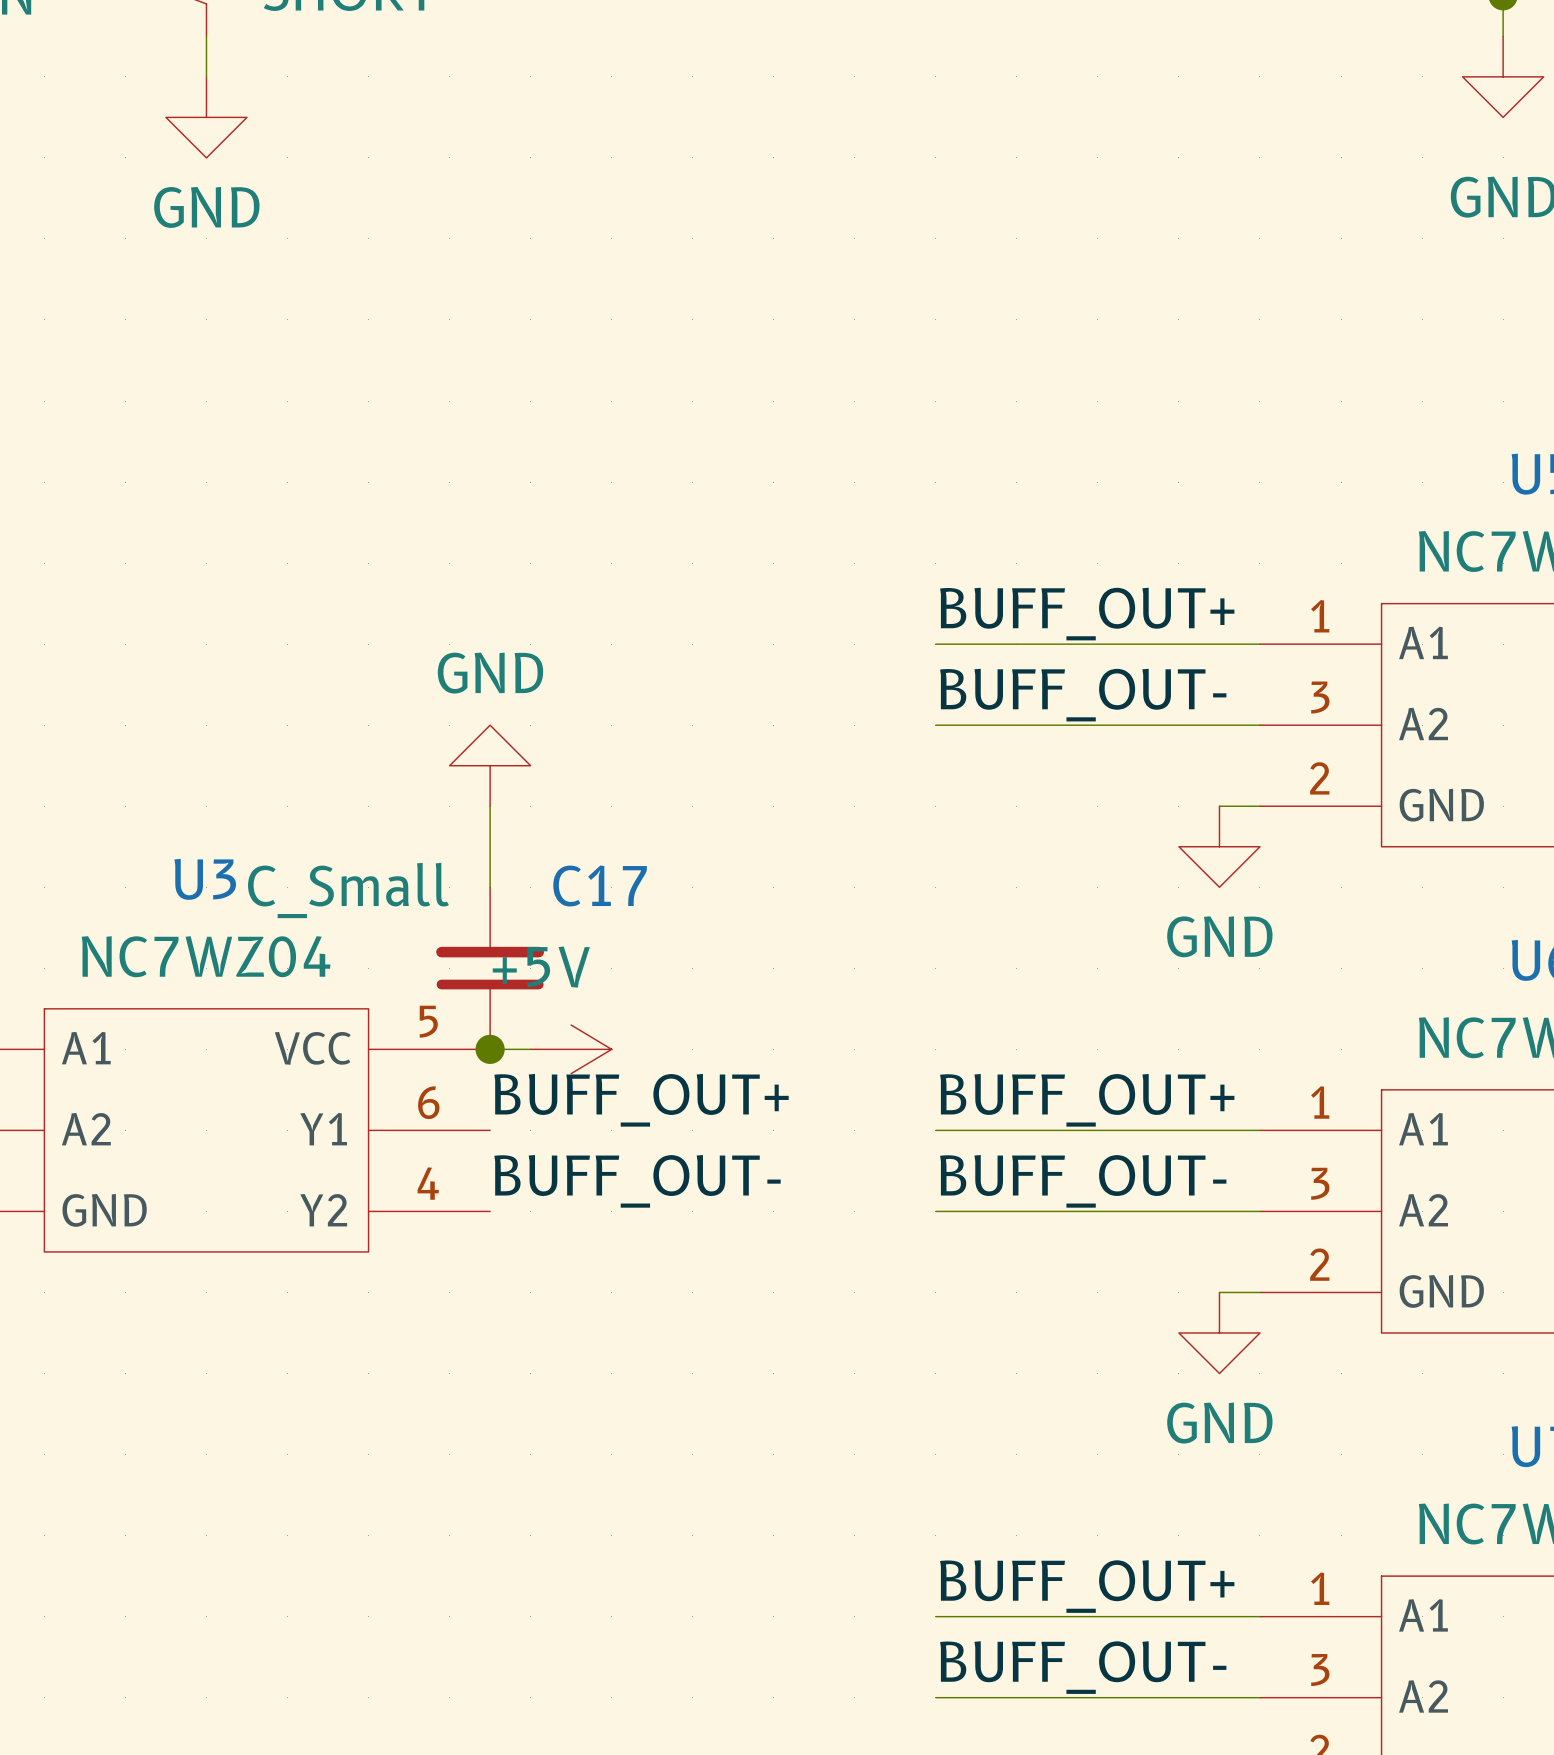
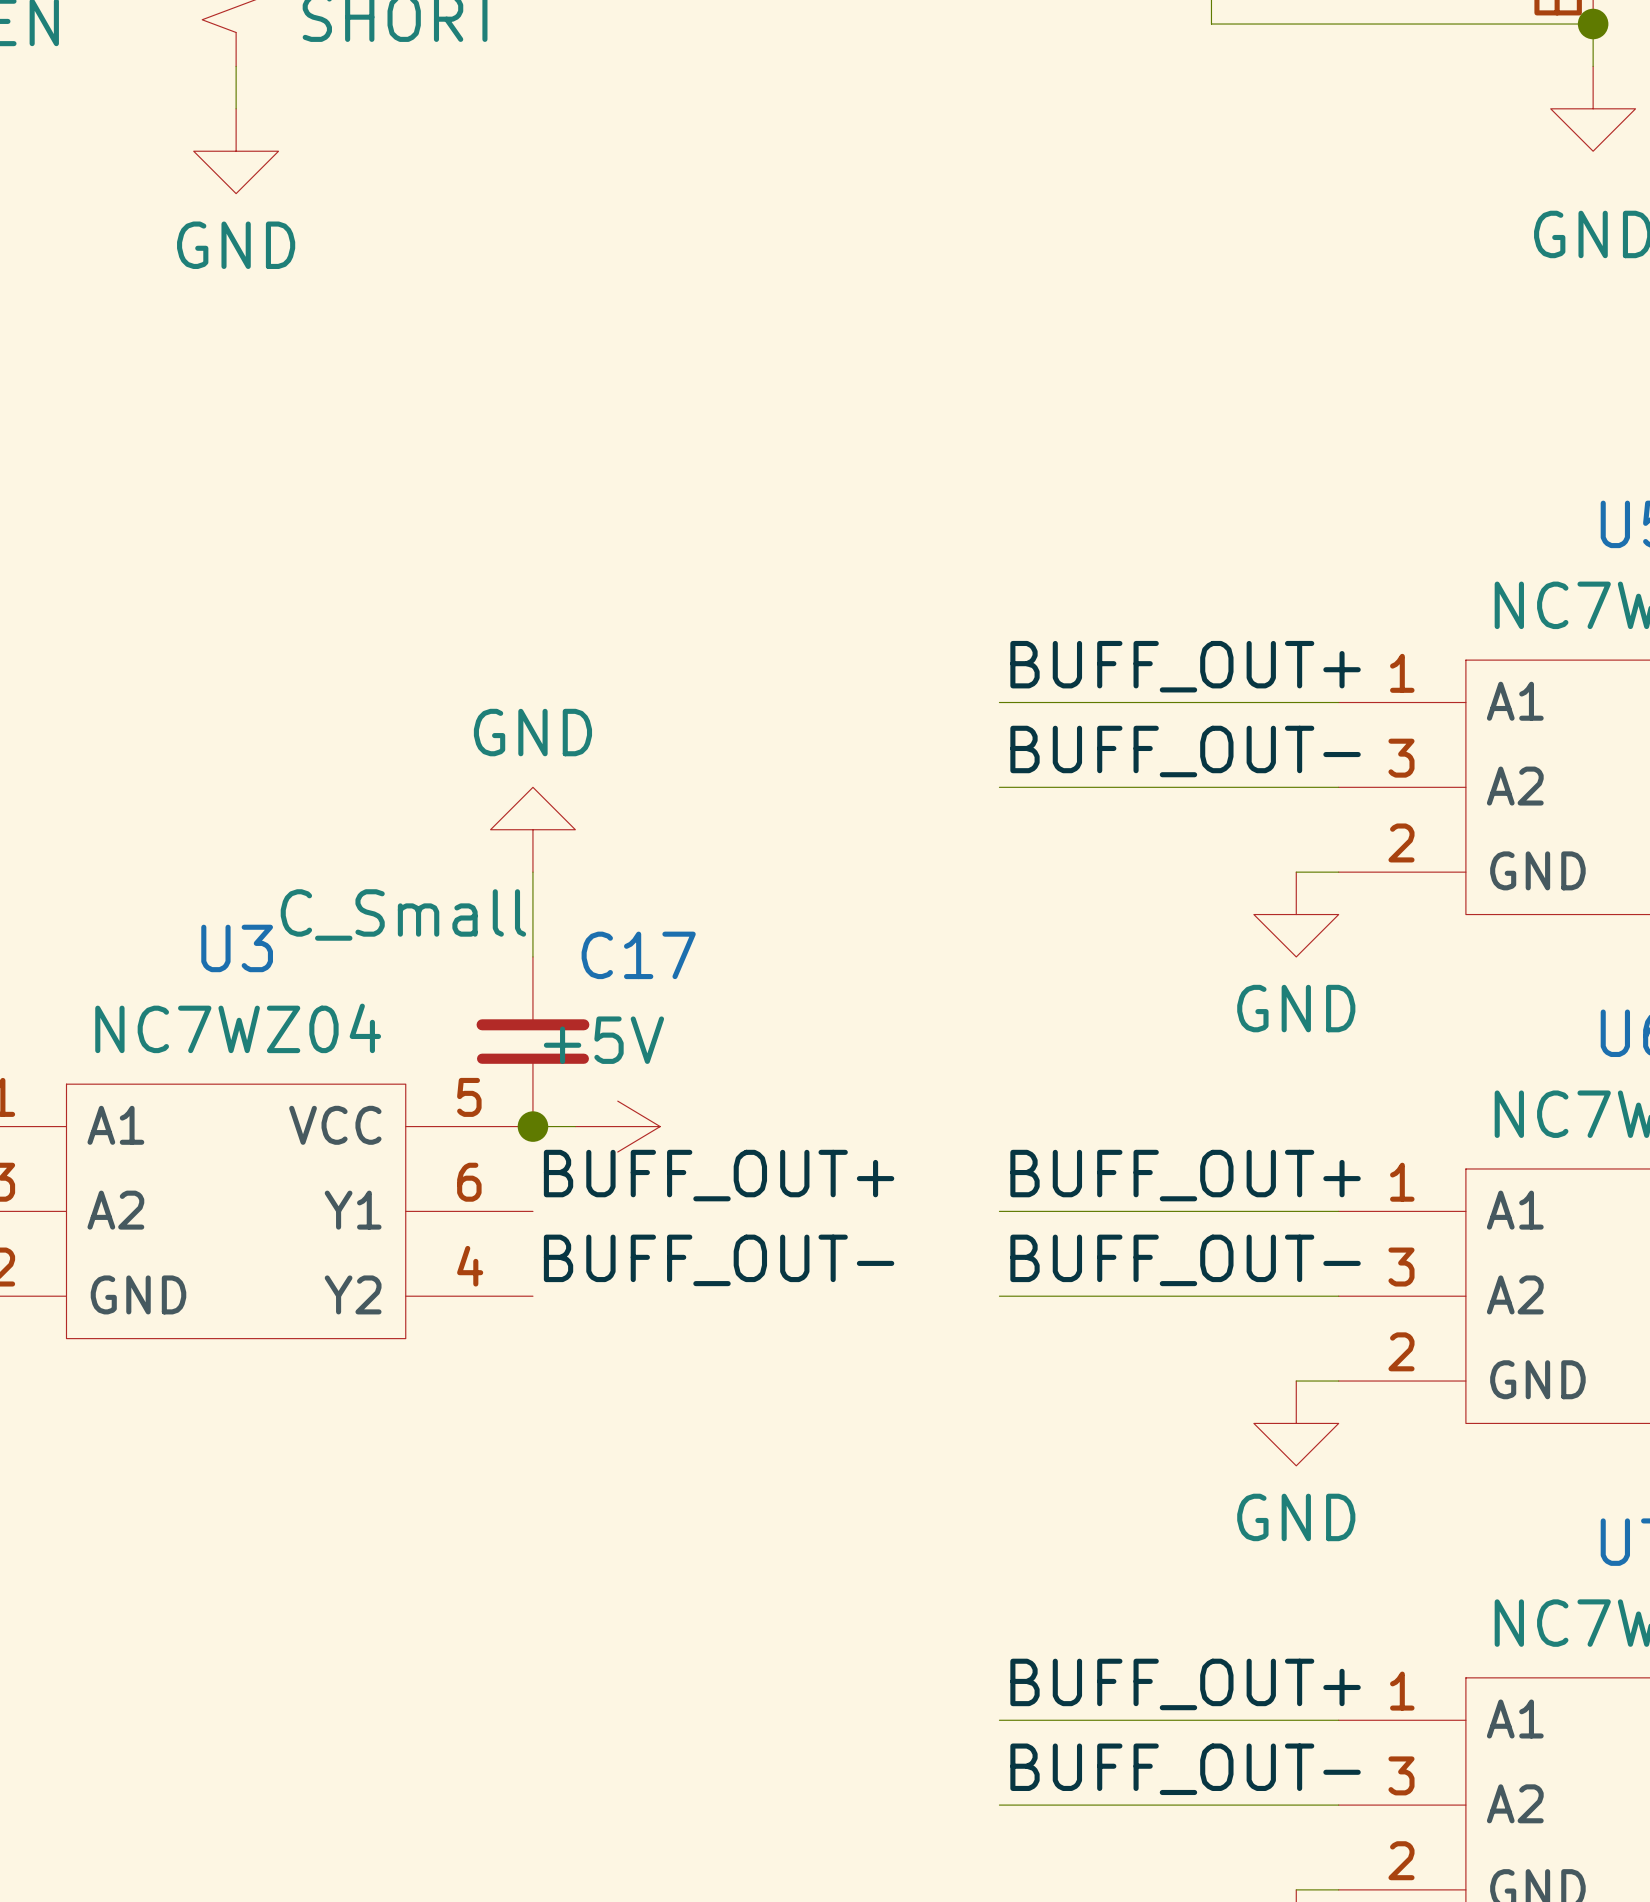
C17 value position: C_Small (348, 890) -> C_Small (403, 914)

